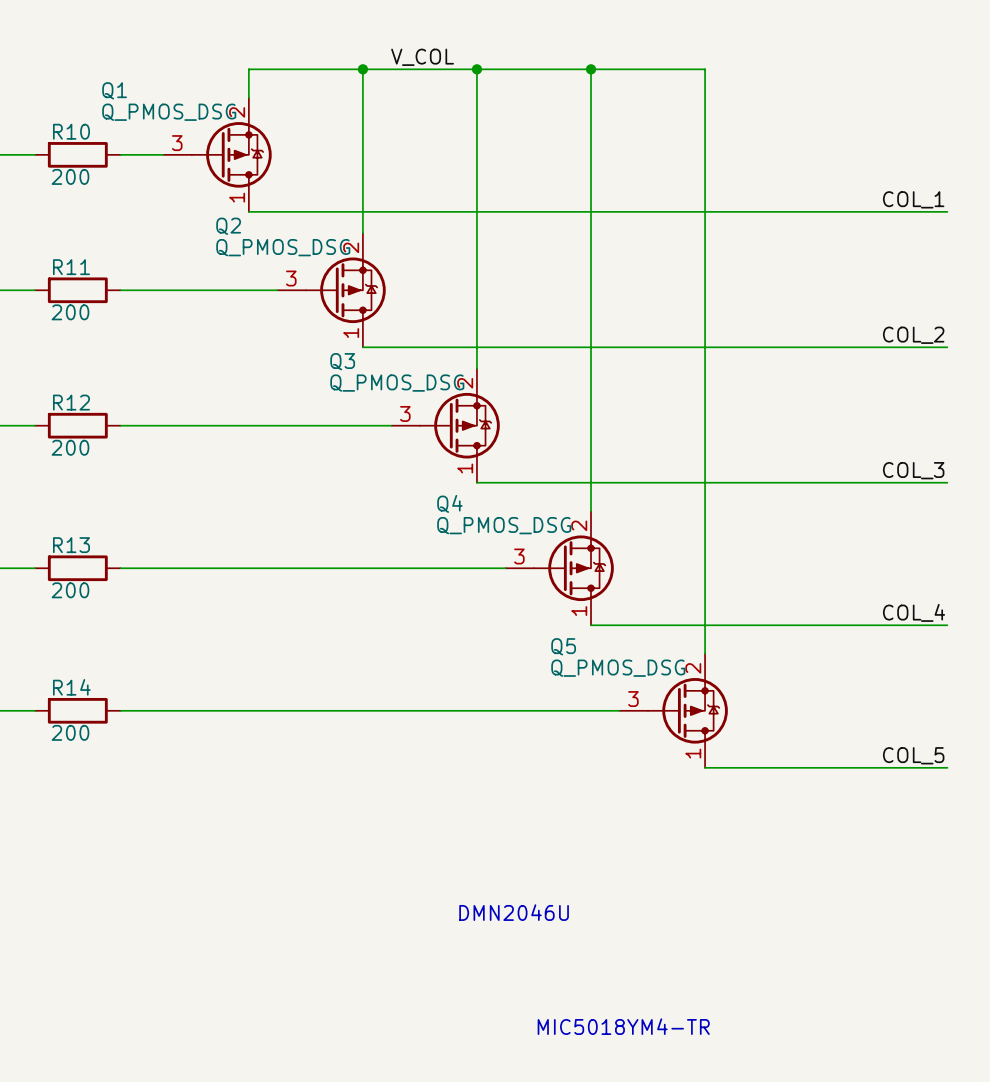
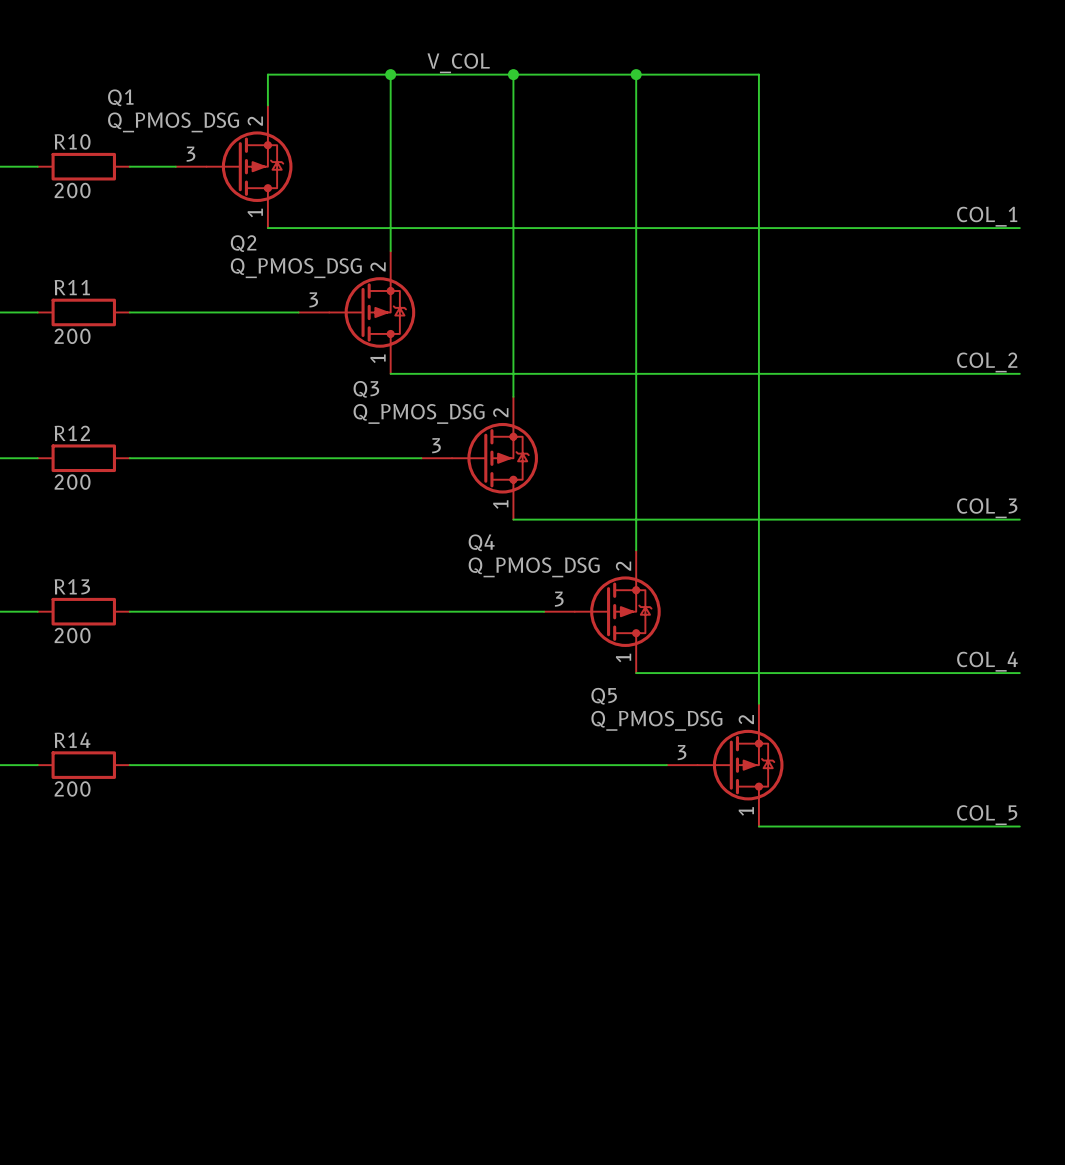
text: DMN2046U (514, 912) -> none
text: MIC5018YM4-TR (623, 1026) -> none

